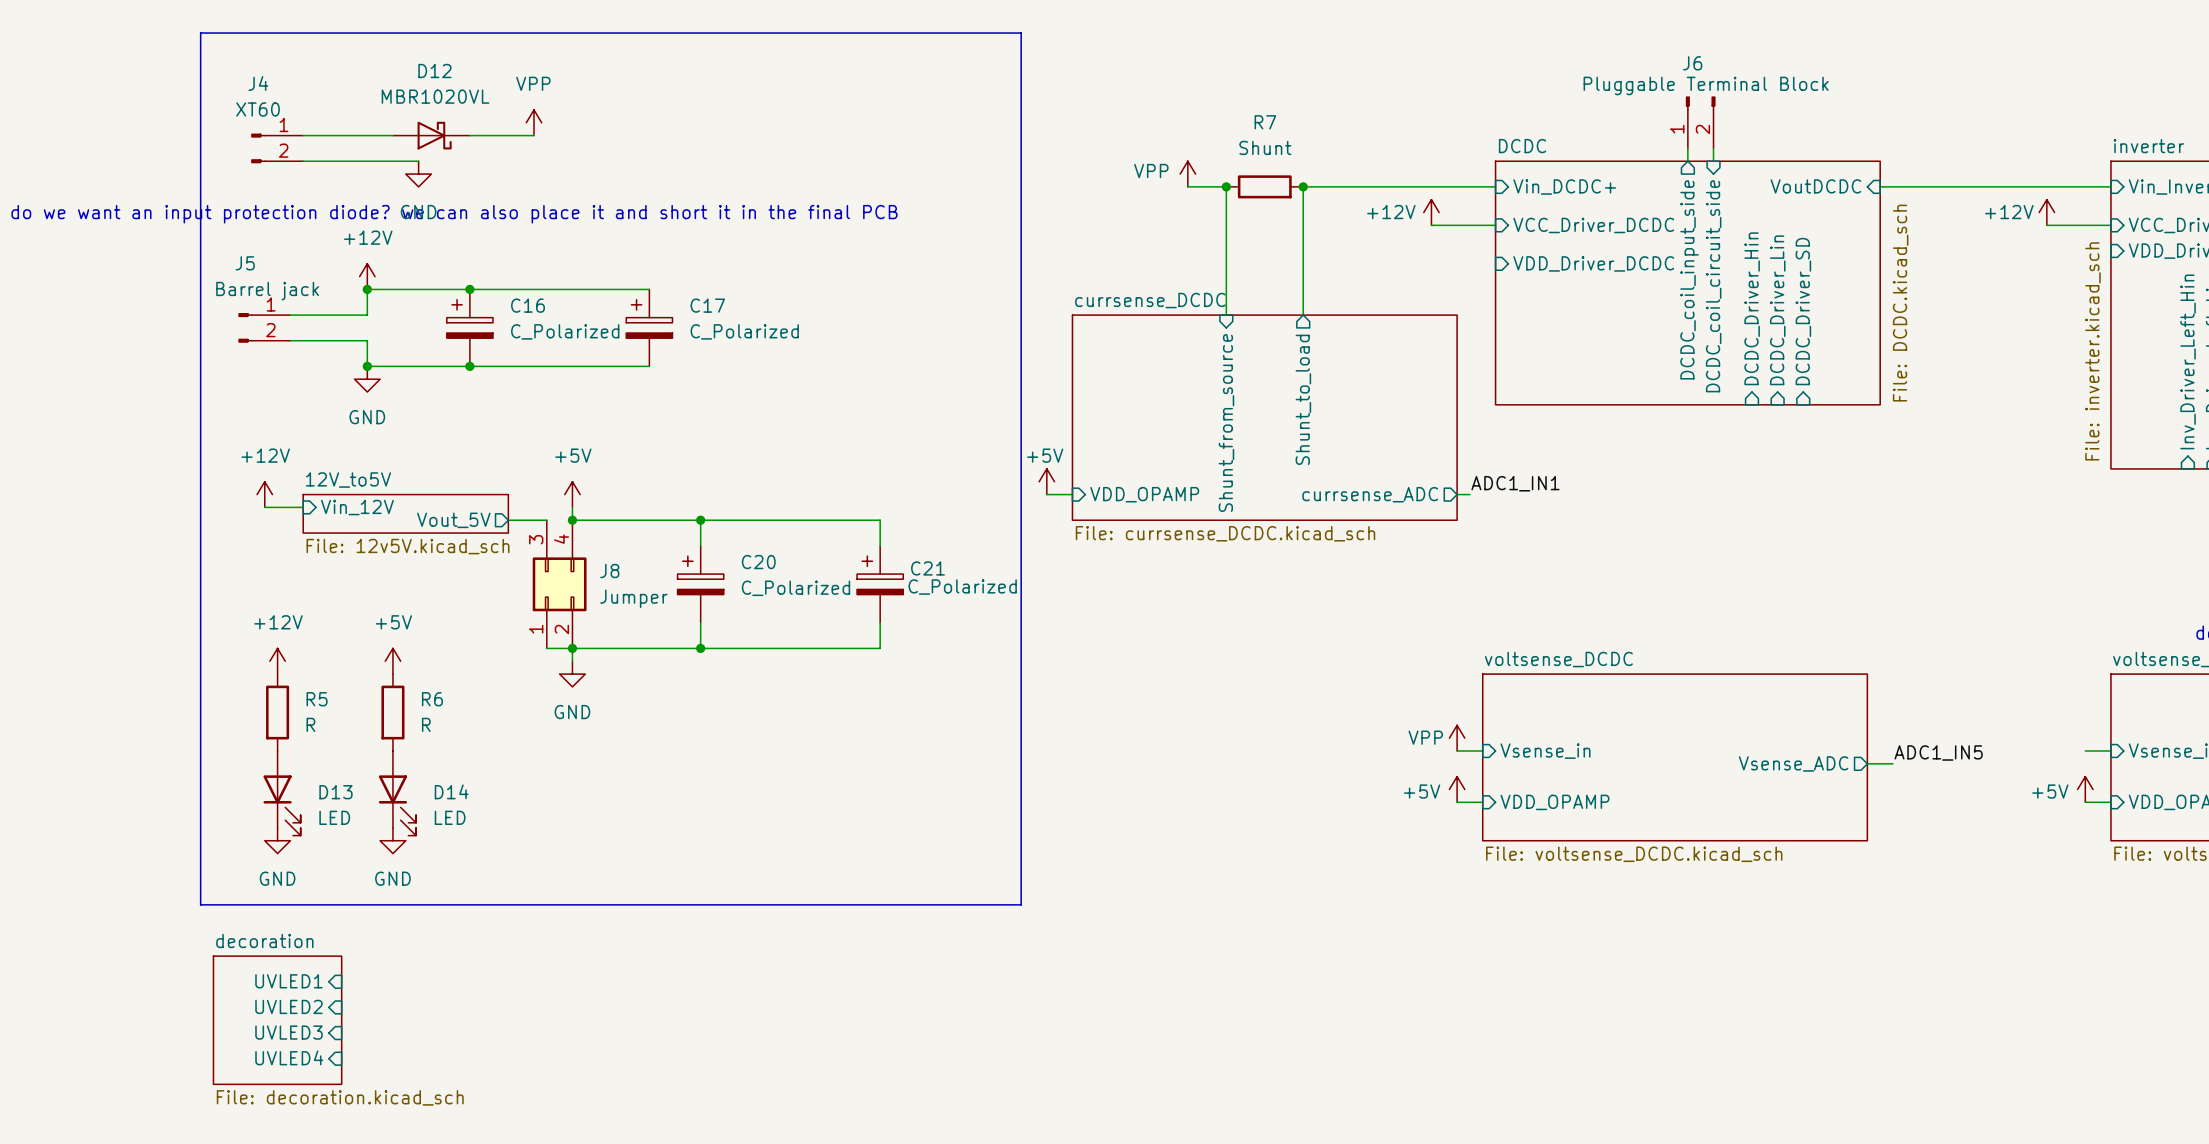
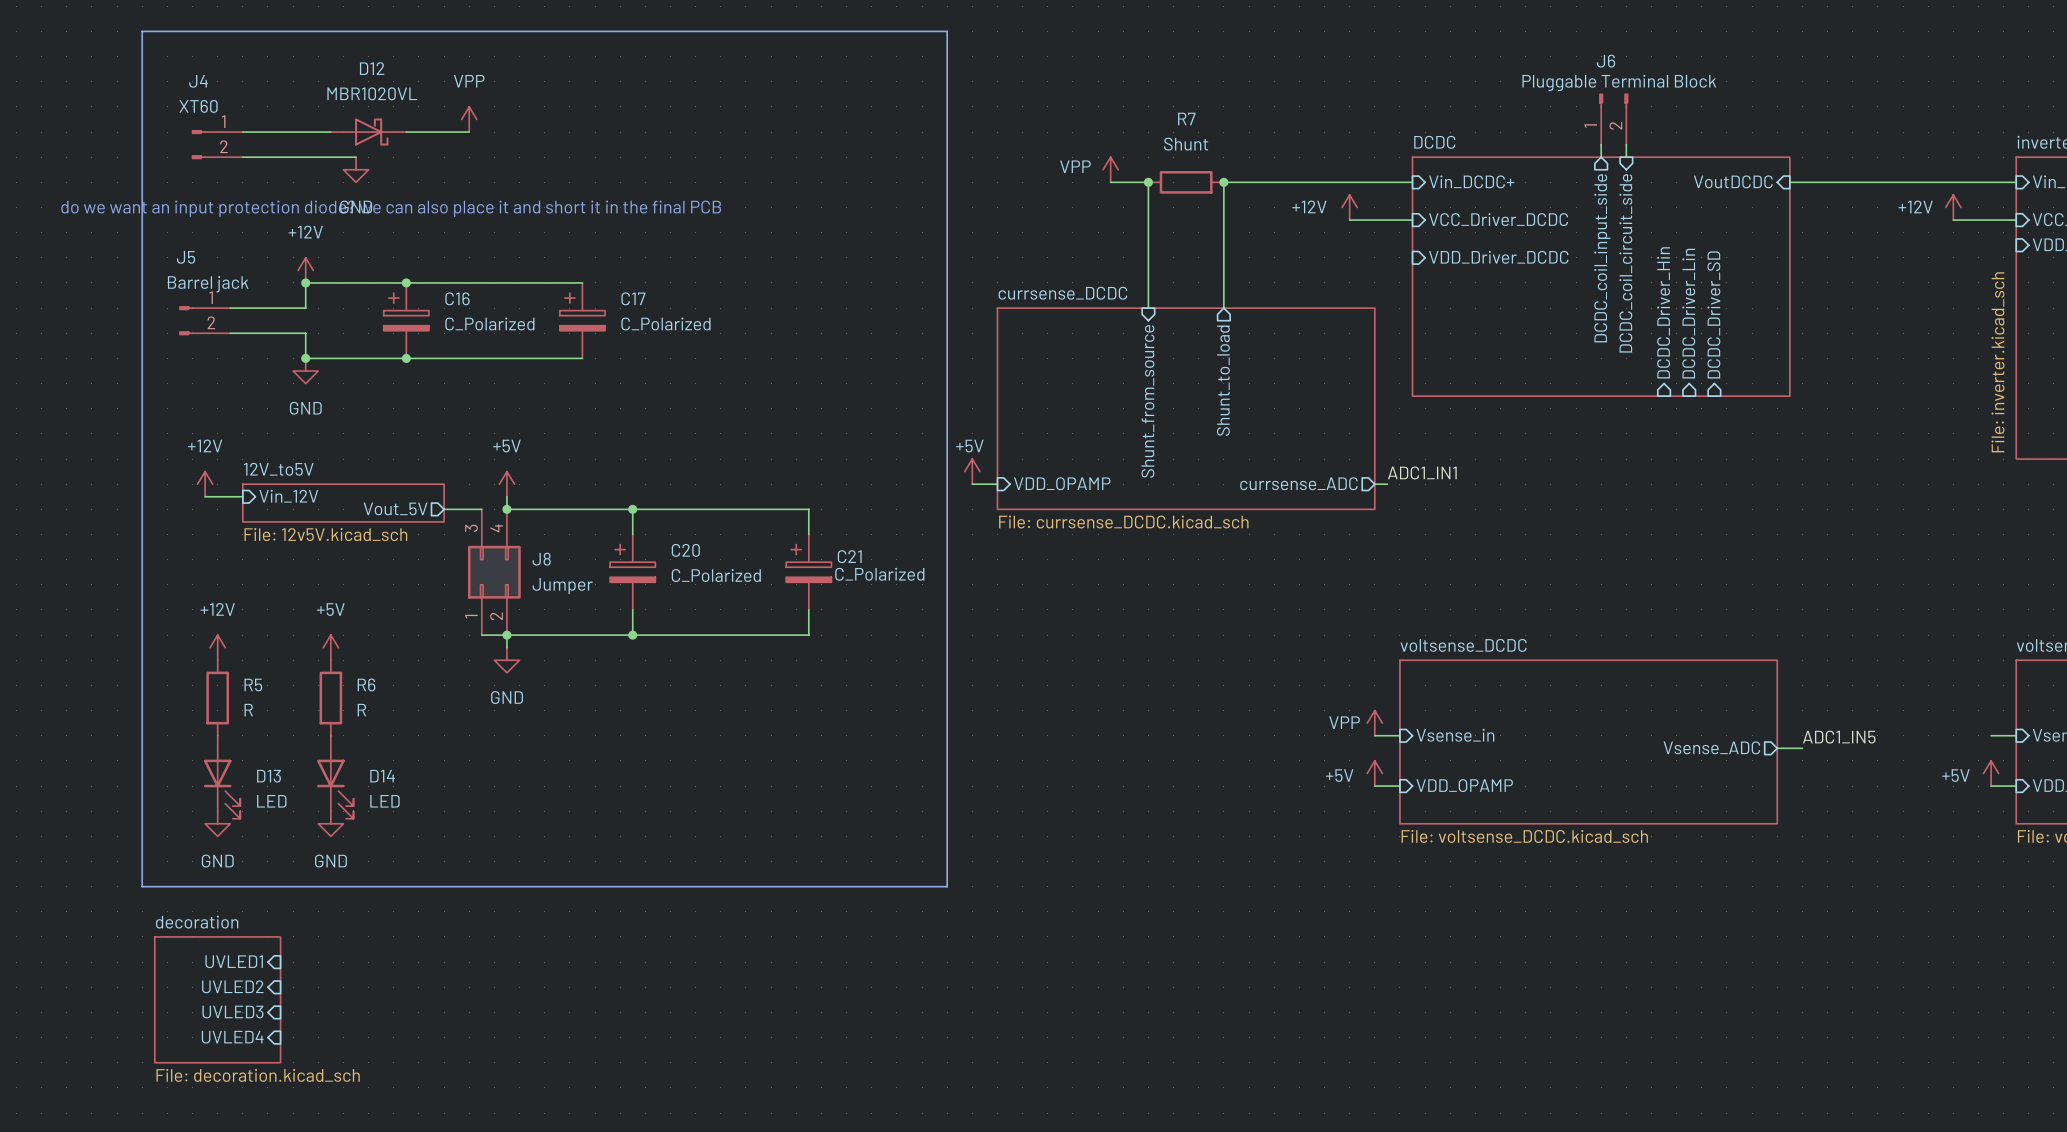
sheet DCDC value: File: DCDC.kicad_sch (1900, 303) -> none

